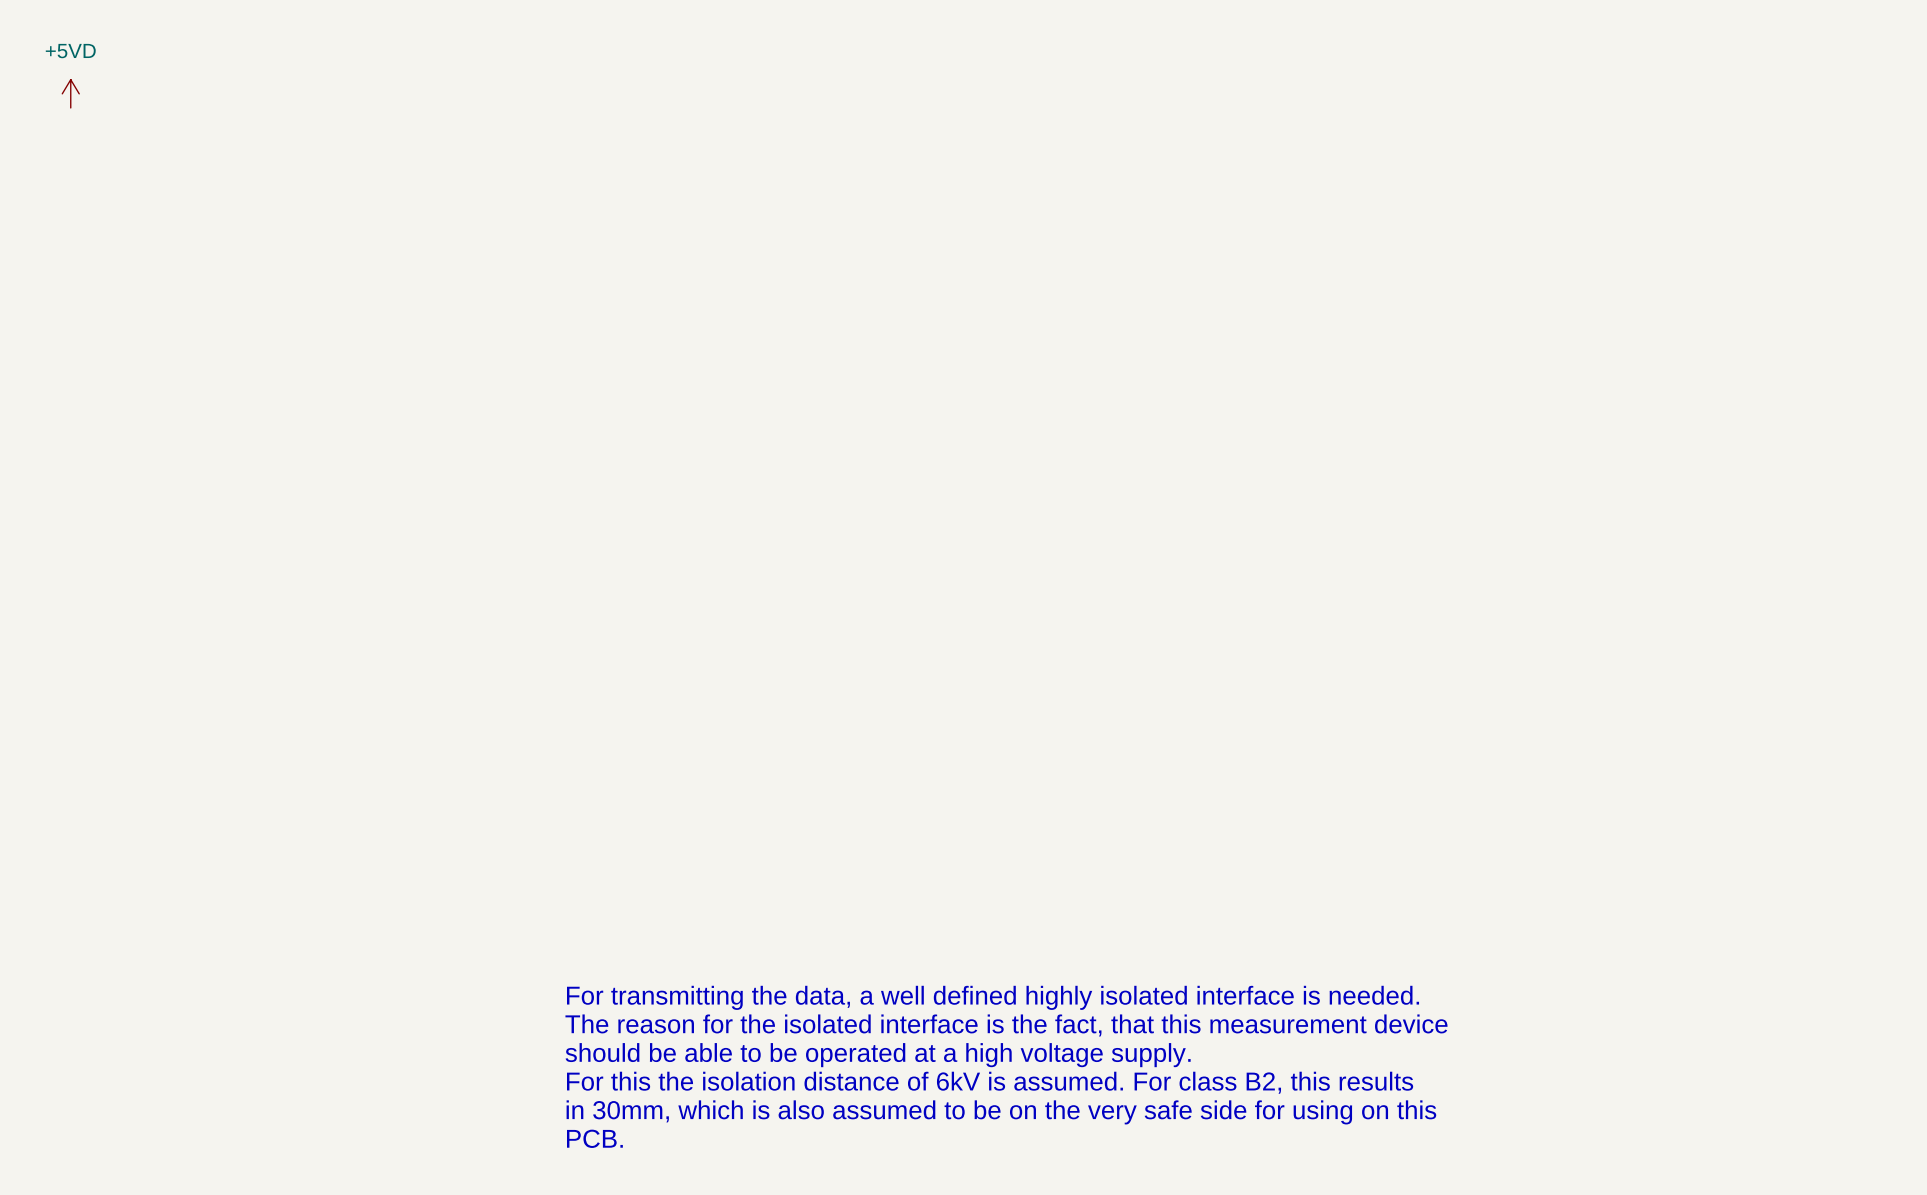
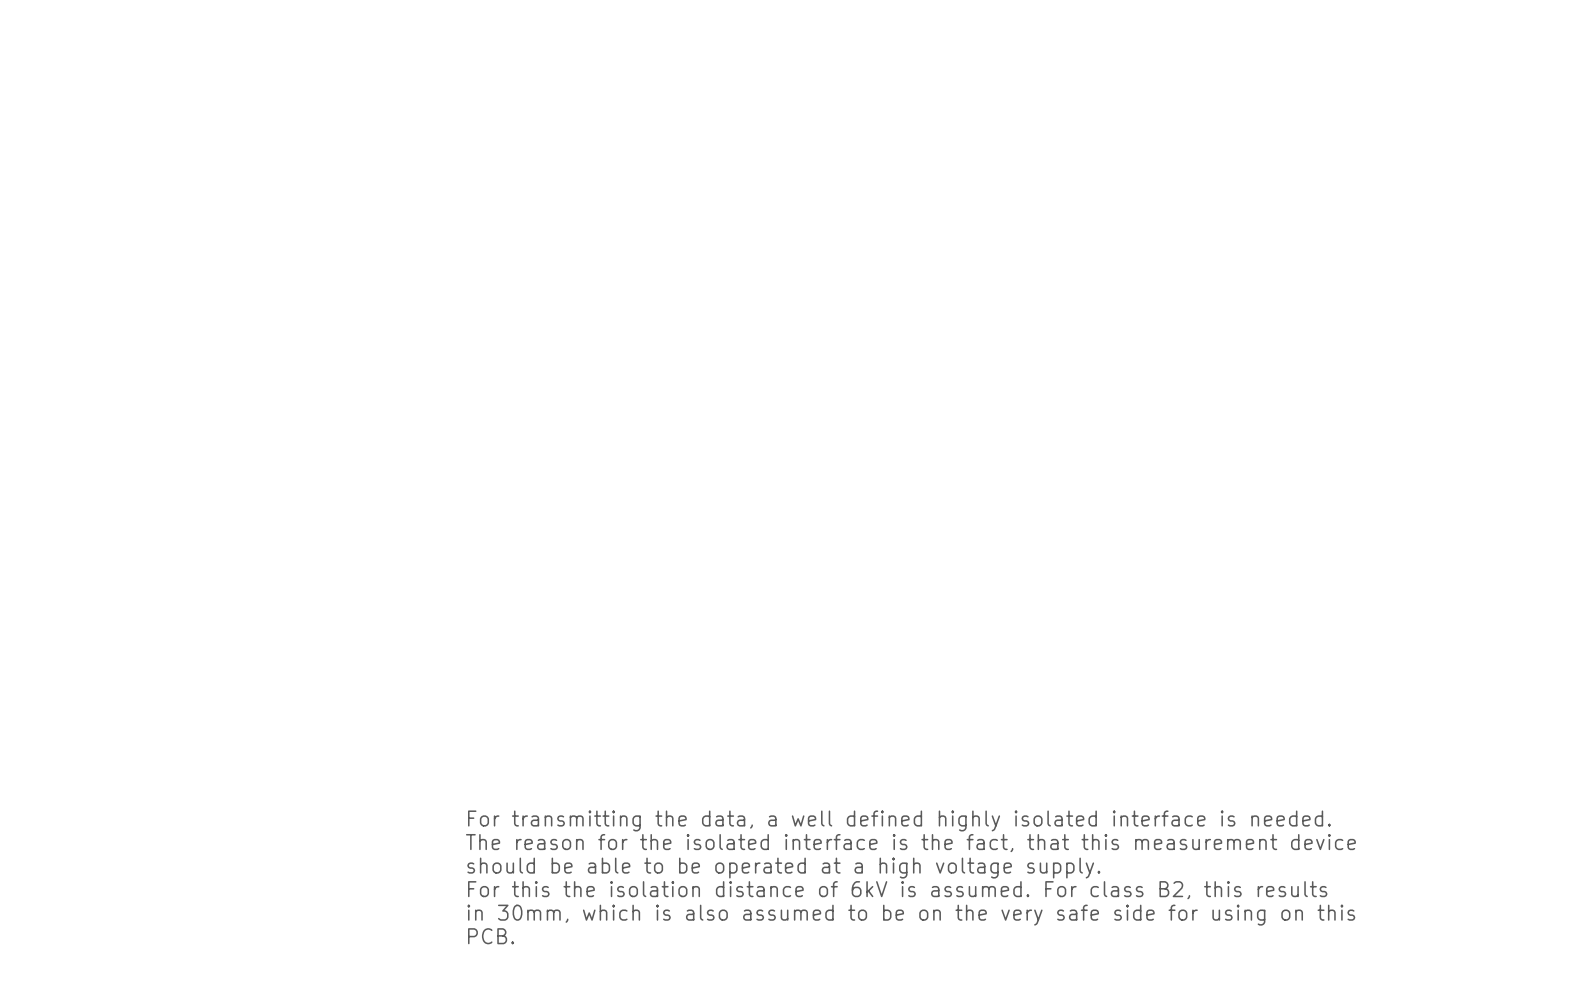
power symbol: +5VD (70, 93) -> none

